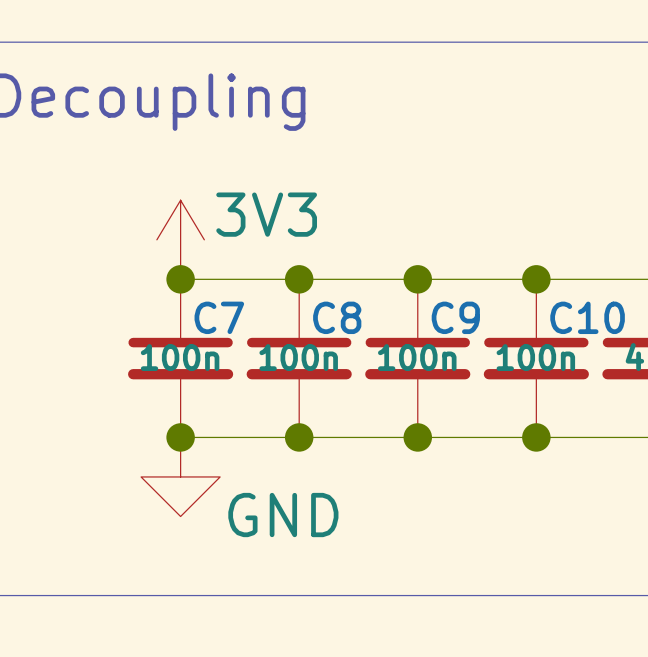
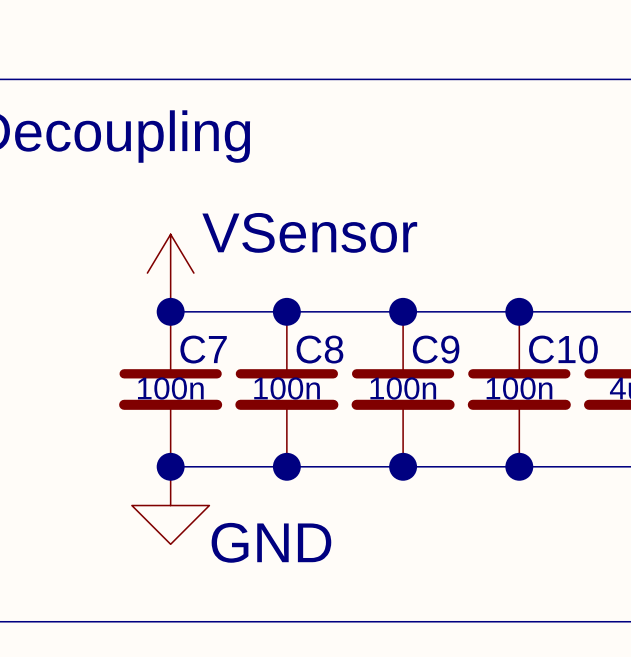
power symbol: 3V3 (180, 239) -> VSensor (170, 273)

